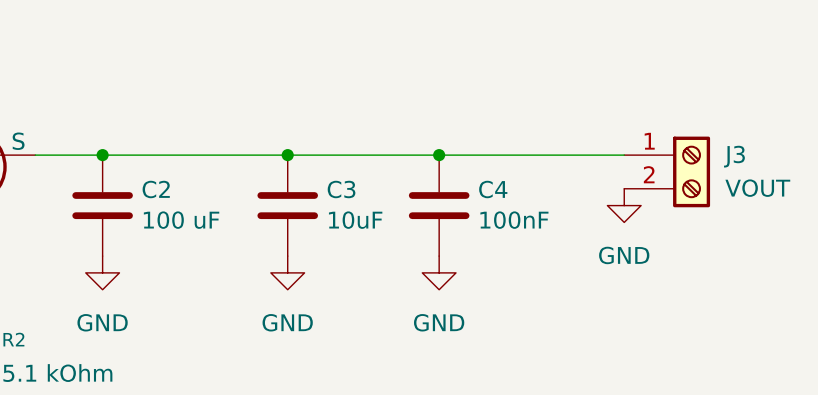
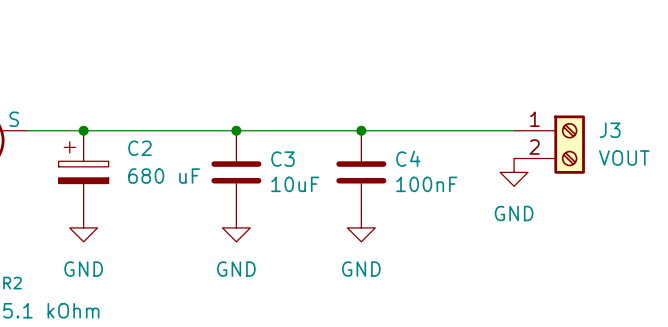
C2 symbol: [72, 155, 133, 257] -> [58, 130, 109, 215]
C2 value: 100 uF (181, 220) -> 680 uF (164, 176)

